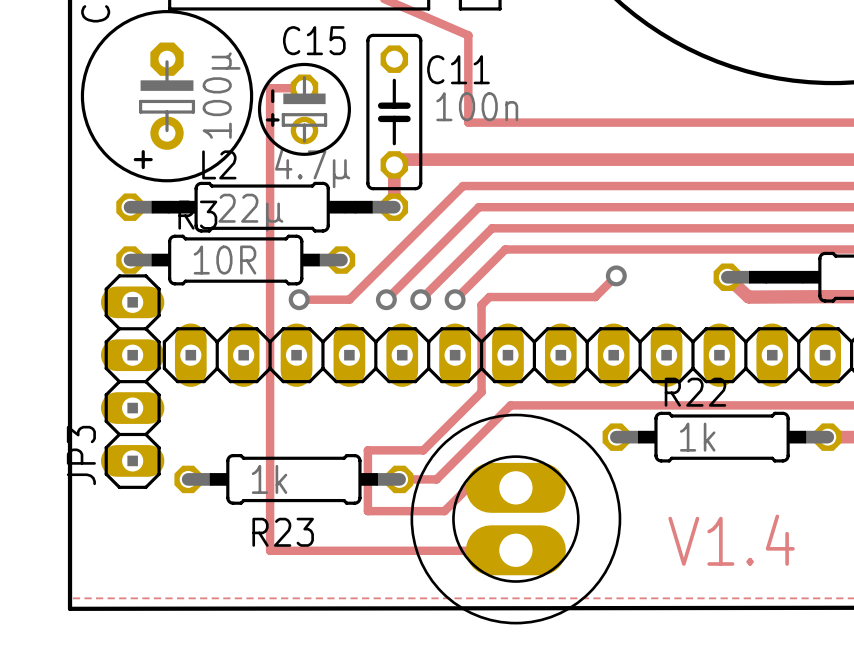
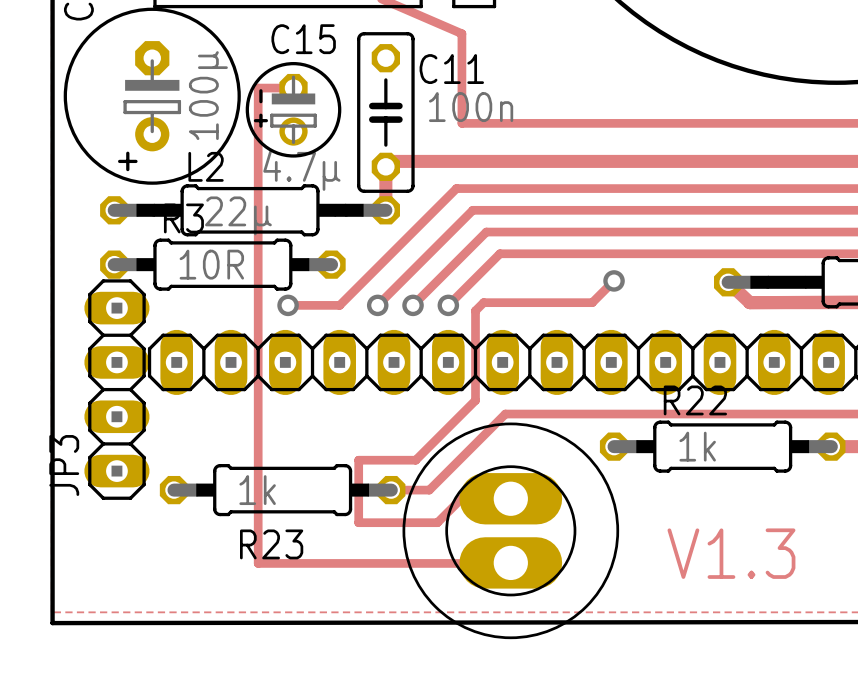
text: V1.4 (731, 540) -> V1.3 (731, 553)

